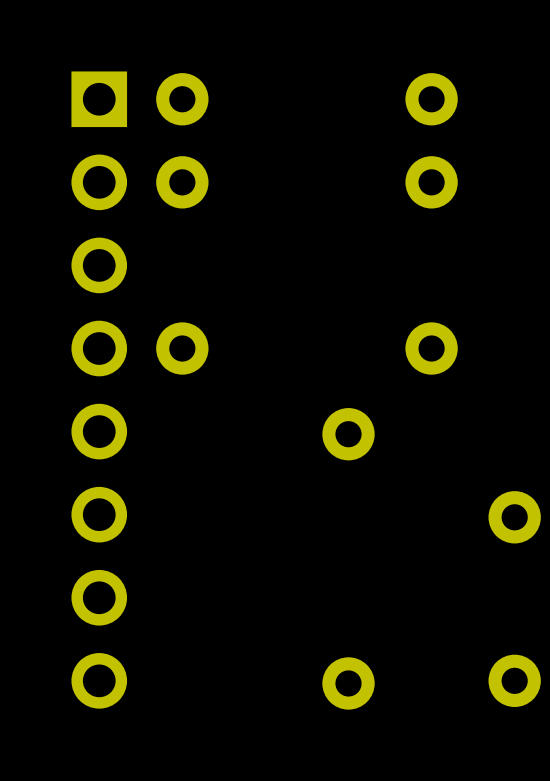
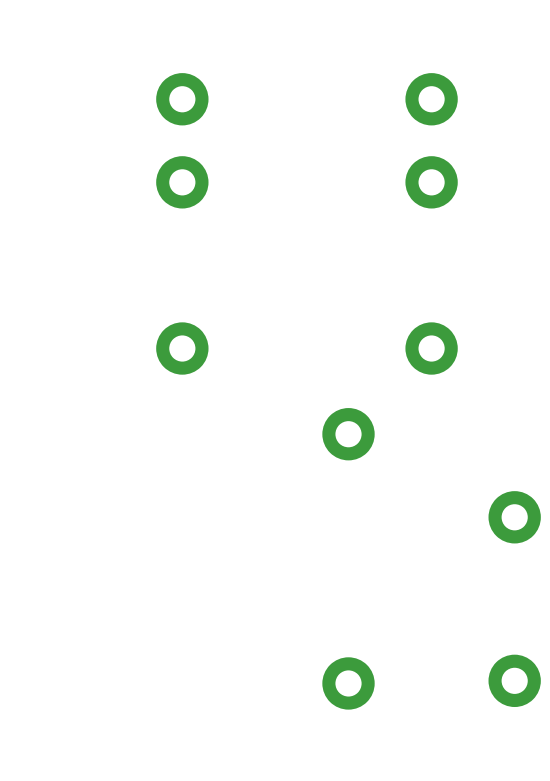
part: (99, 390) -> none

